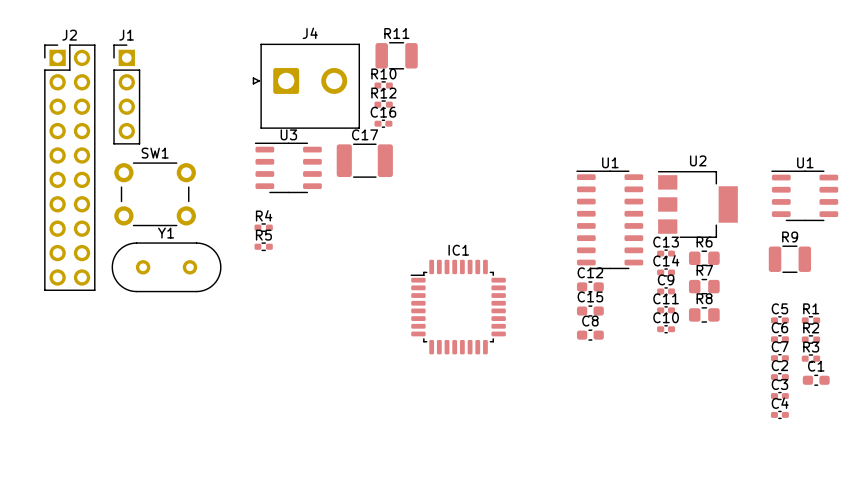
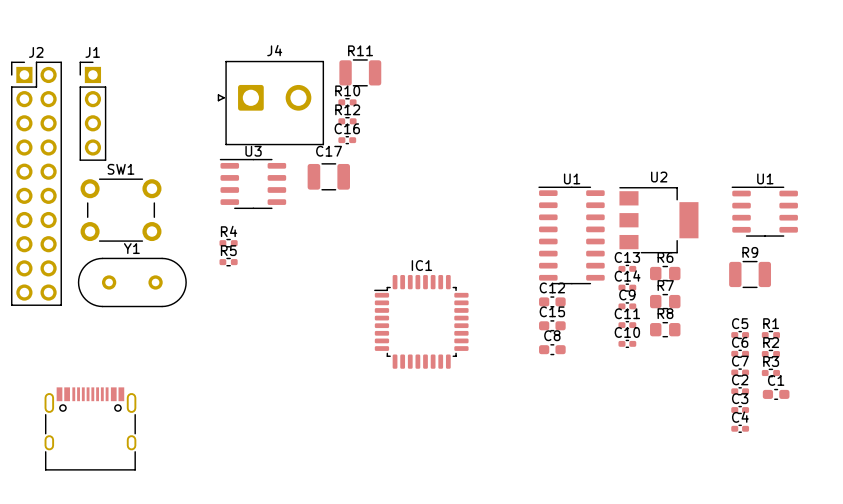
C17 footprint: [336, 143, 393, 178] -> [307, 163, 350, 191]
part: none -> (90, 428)

